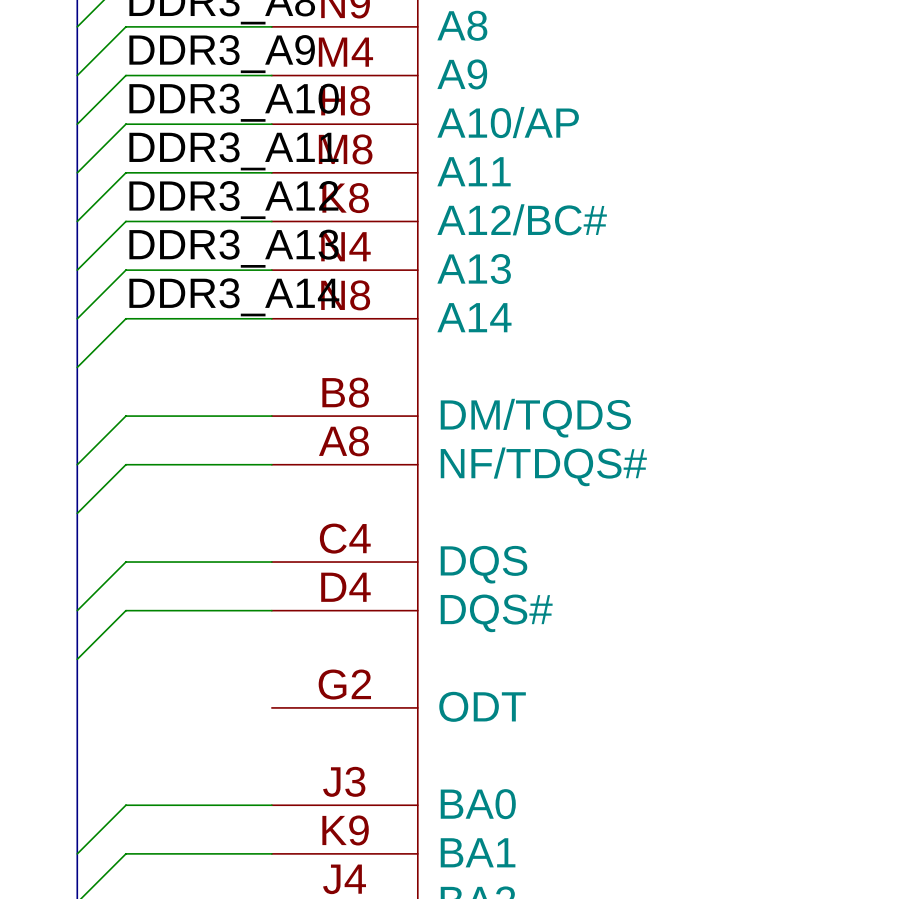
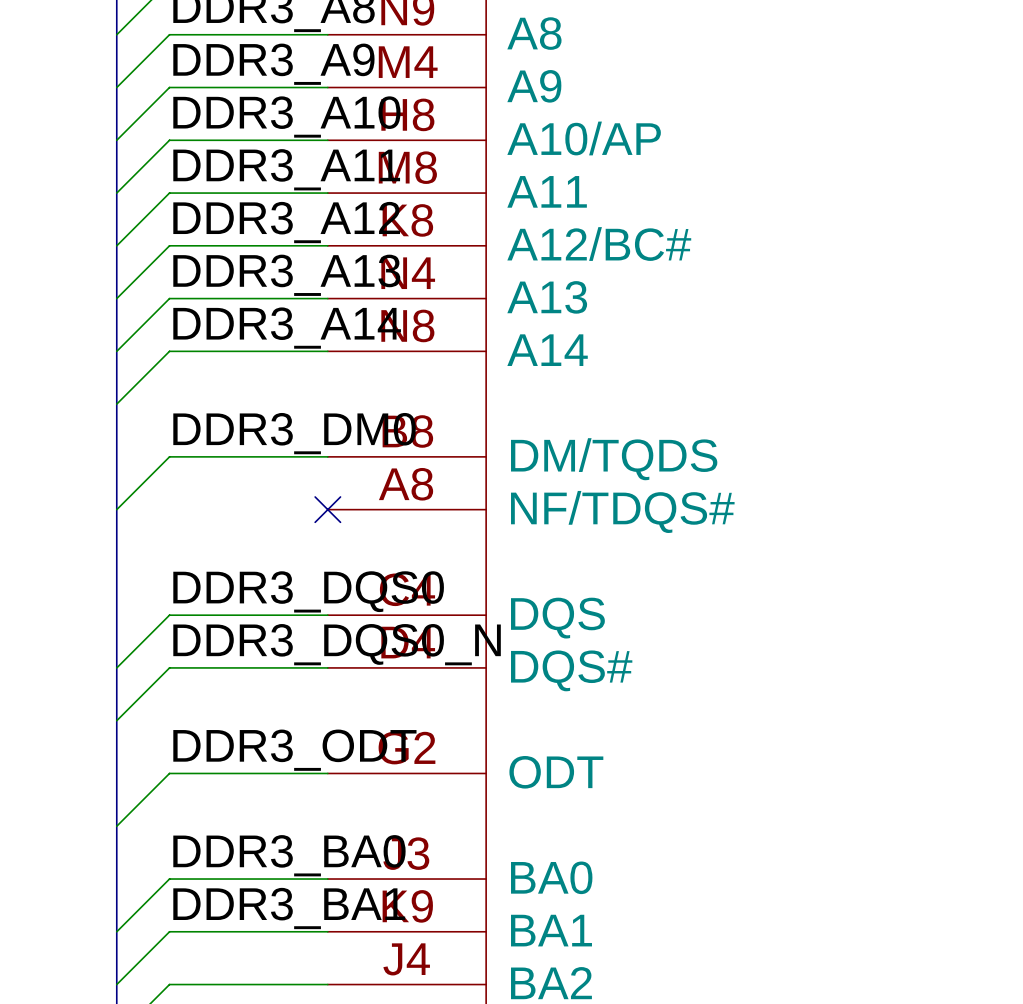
label: none -> DDR3_DM0 (294, 433)
wire: (271, 464) (125, 464) (77, 513) -> (327, 773) (169, 773) (116, 826)
no-connect mark: none -> (327, 509)
label: none -> DDR3_DQS0 (308, 591)
label: none -> DDR3_DQS0_N (337, 644)
label: none -> DDR3_ODT (294, 750)
label: none -> DDR3_BA0 (289, 855)
label: none -> DDR3_BA1 (289, 908)

